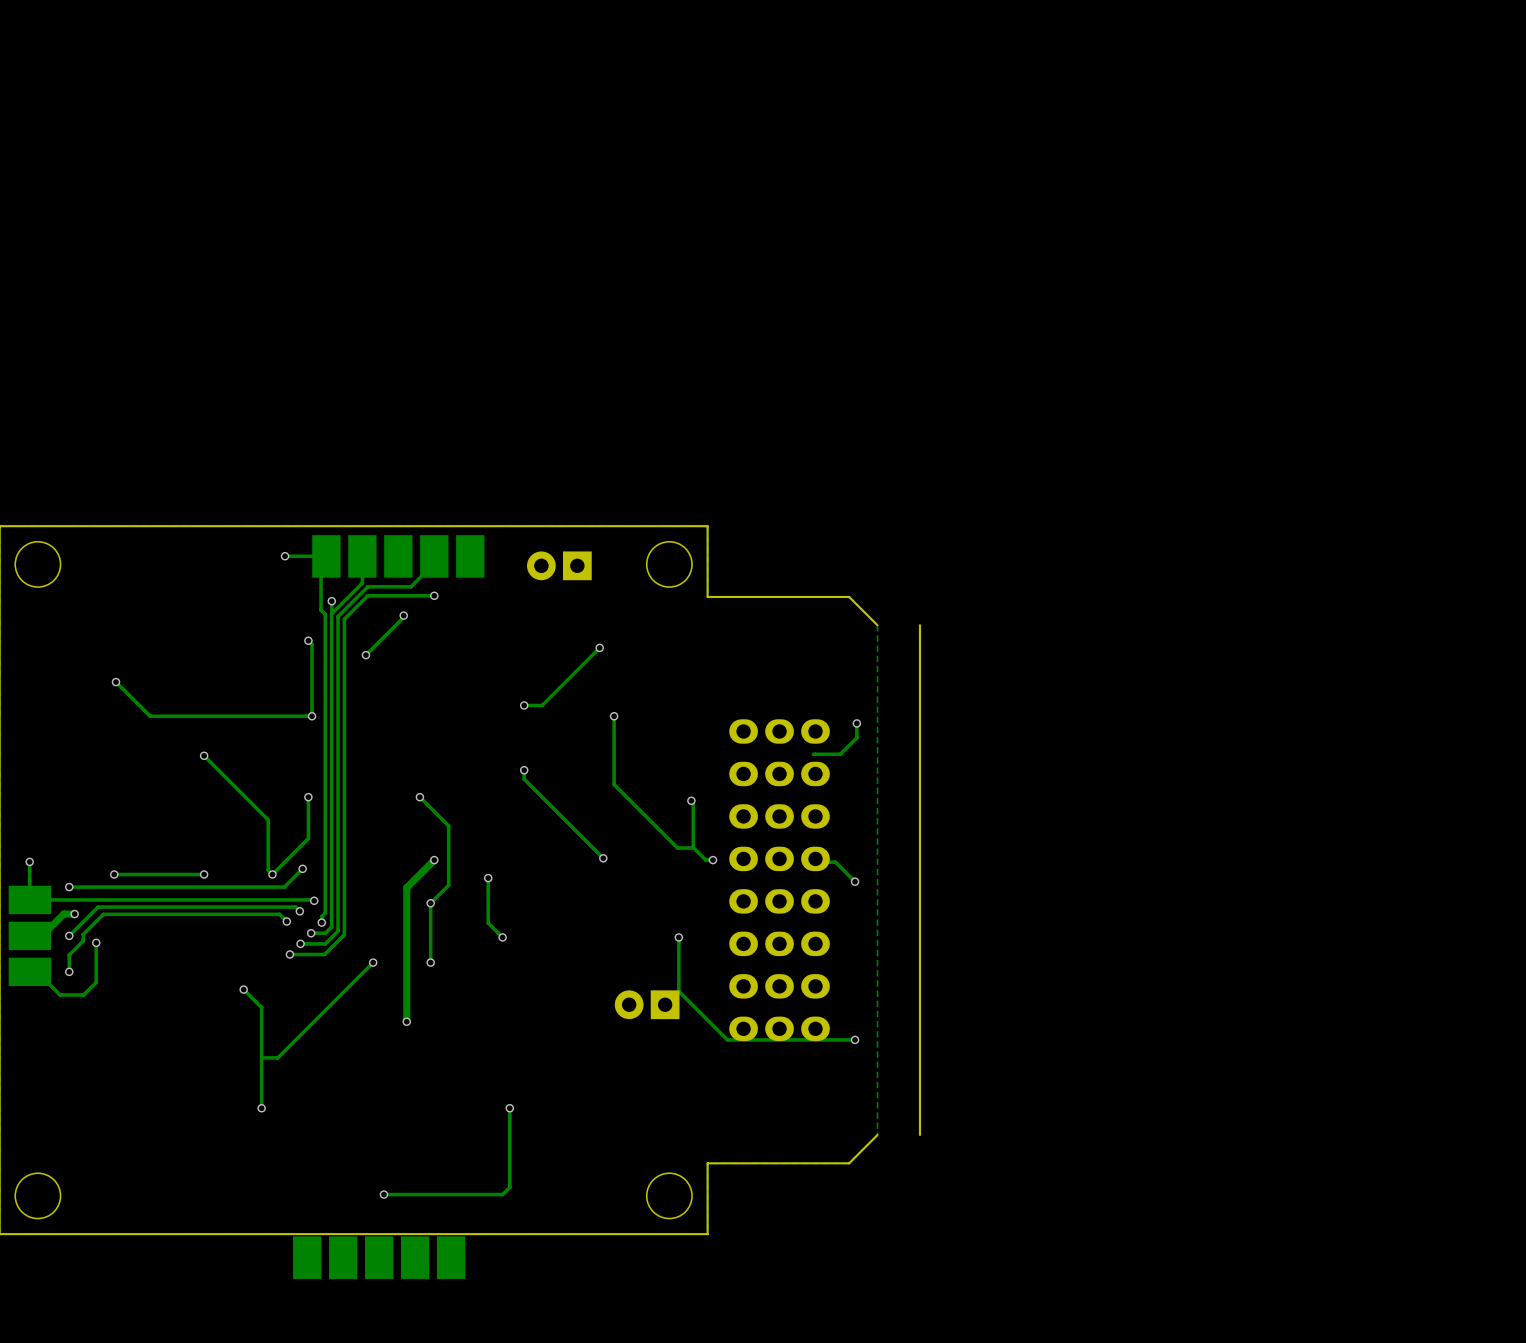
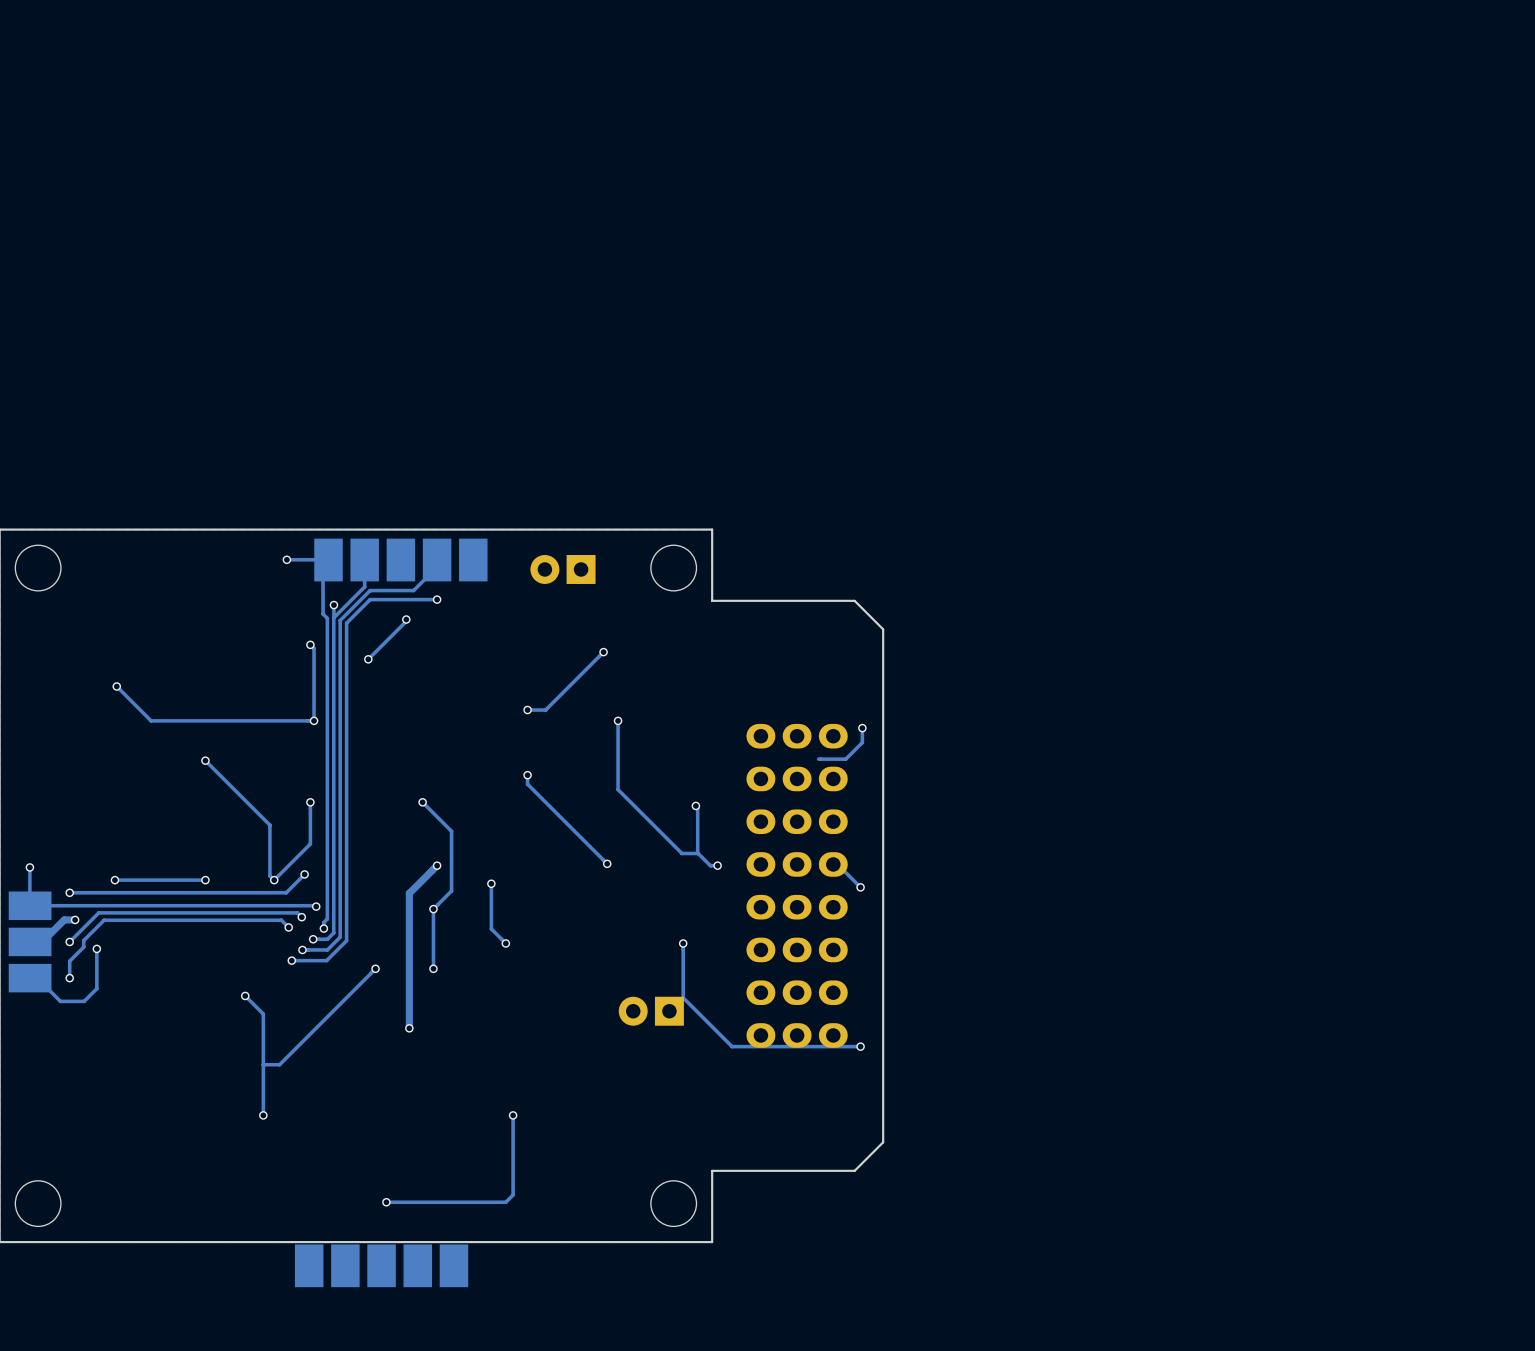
board edge: (919, 625) (919, 1135) -> (883, 629) (883, 1142)
part: (743, 880) -> none
part: none -> (760, 885)
part: (779, 880) -> none
part: none -> (797, 885)
part: (815, 880) -> none
part: none -> (833, 885)

